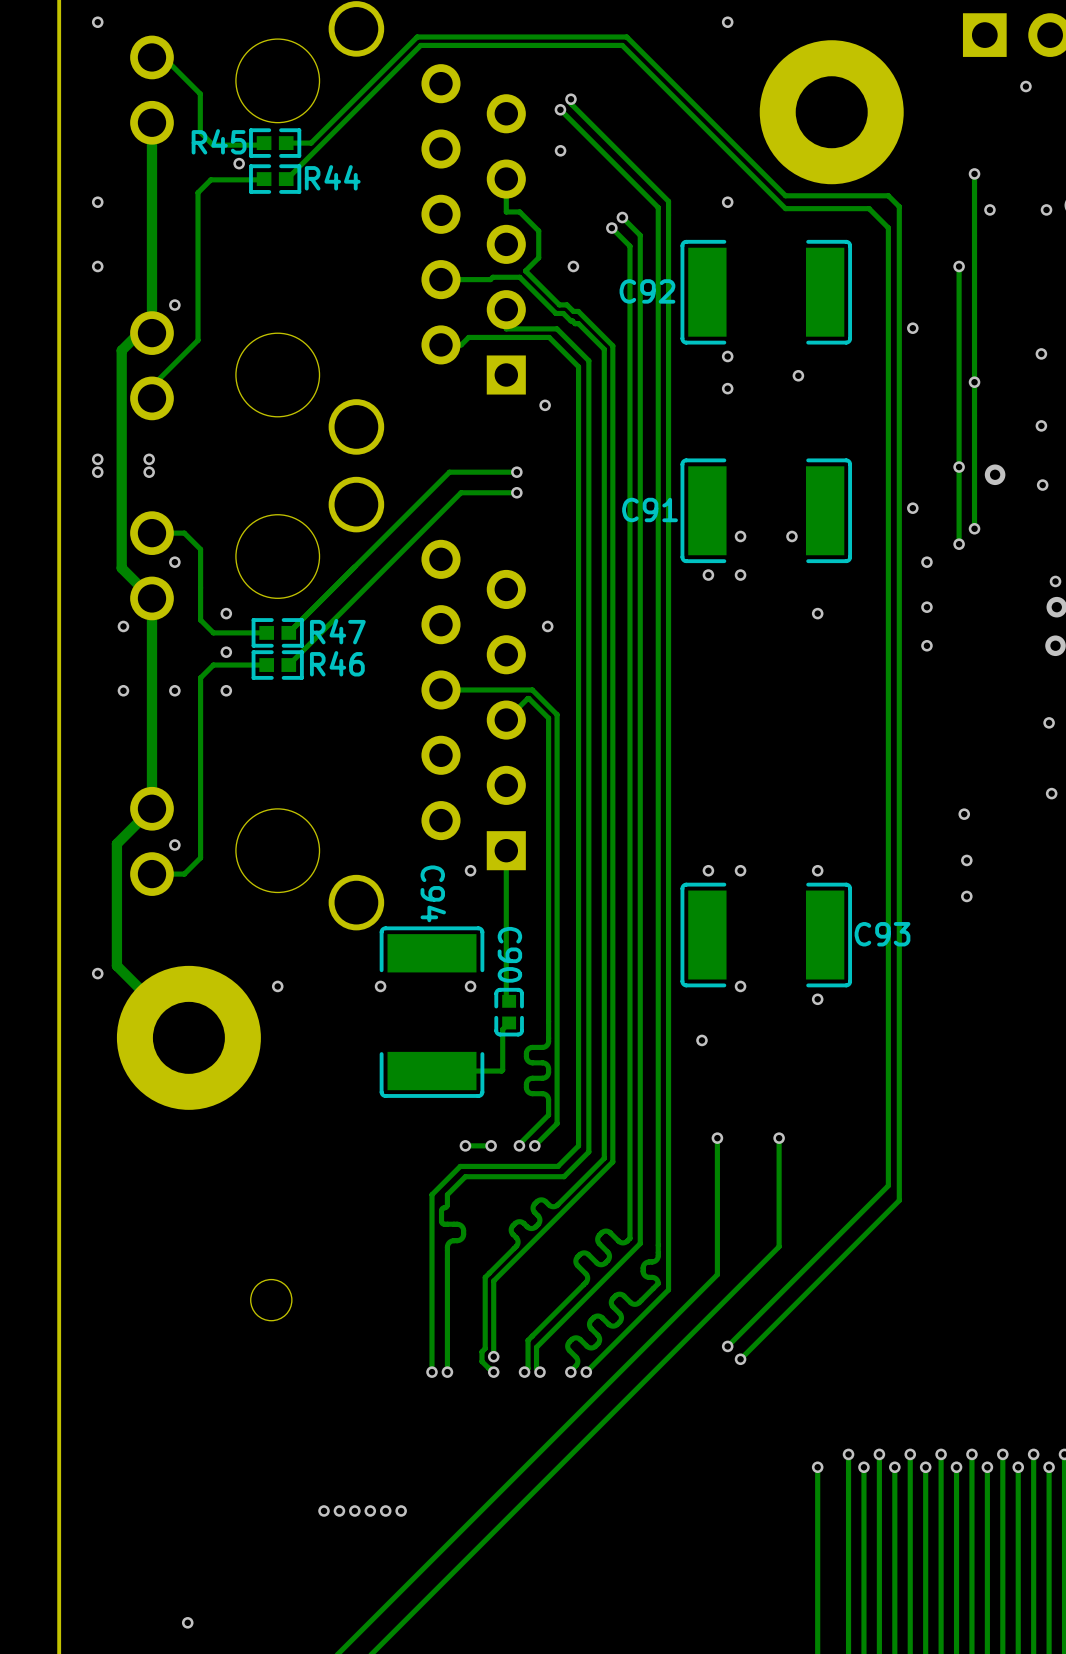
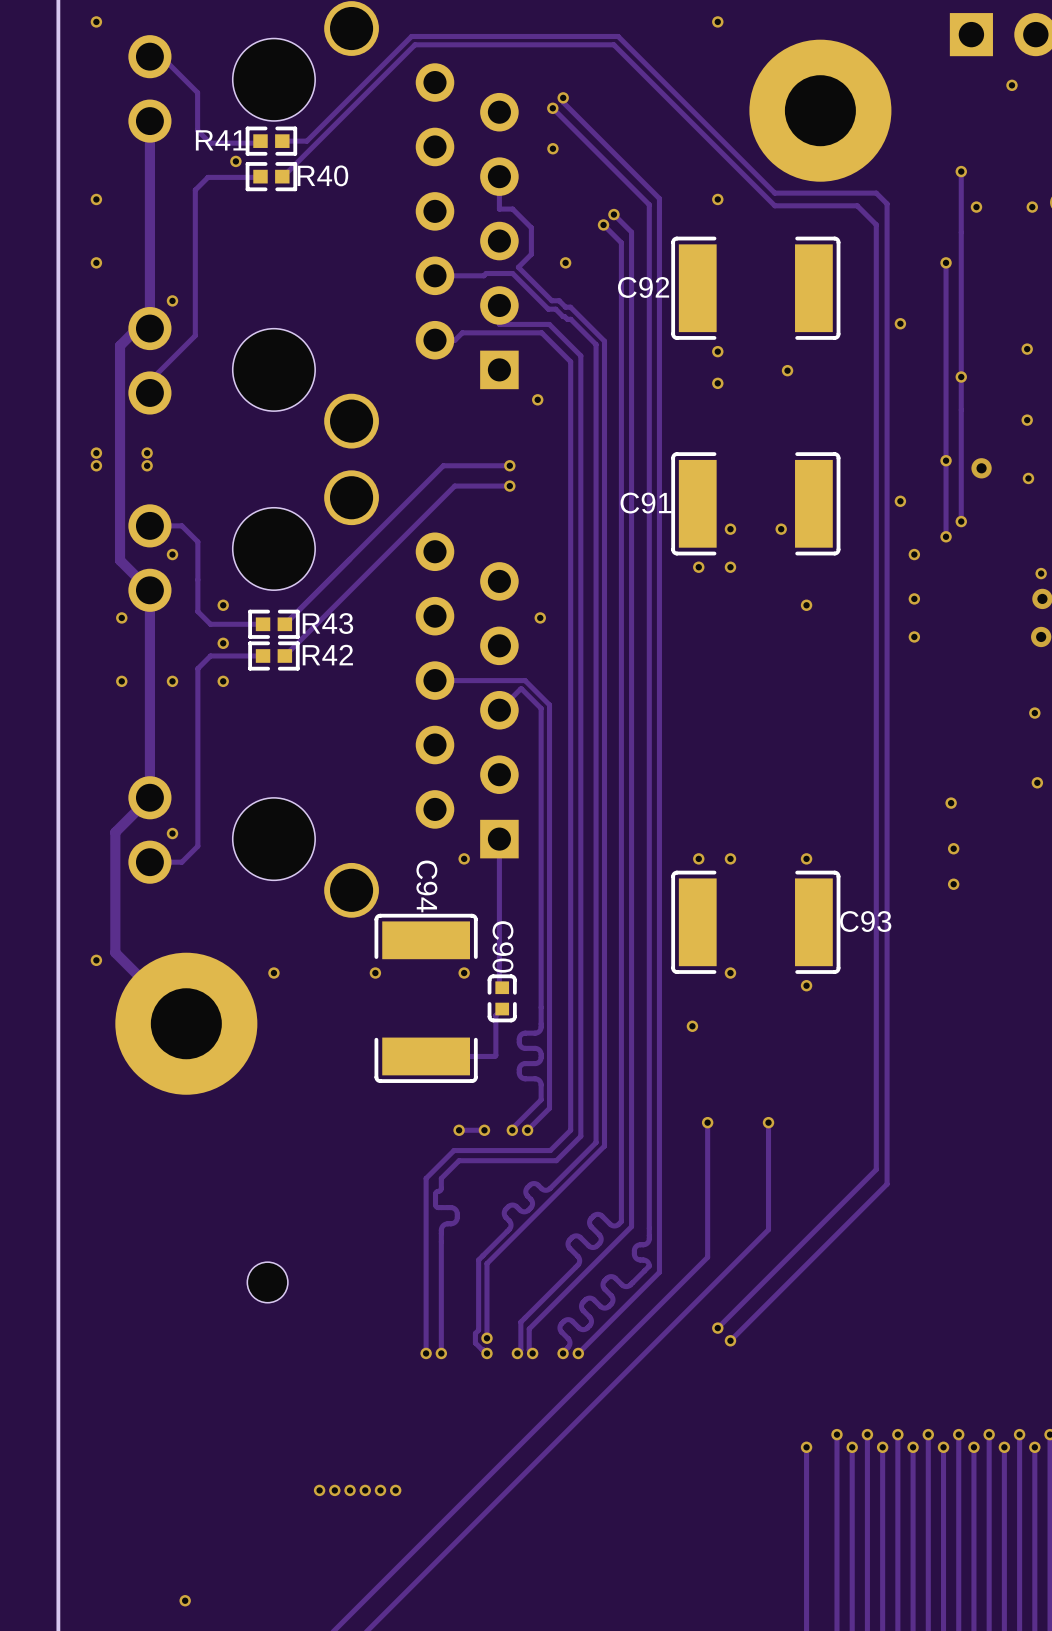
R45 name: R45 (219, 141) -> R41 (221, 140)
R44 name: R44 (332, 177) -> R40 (322, 175)
R47 name: R47 (337, 631) -> R43 (327, 623)
R46 name: R46 (337, 663) -> R42 (327, 655)

